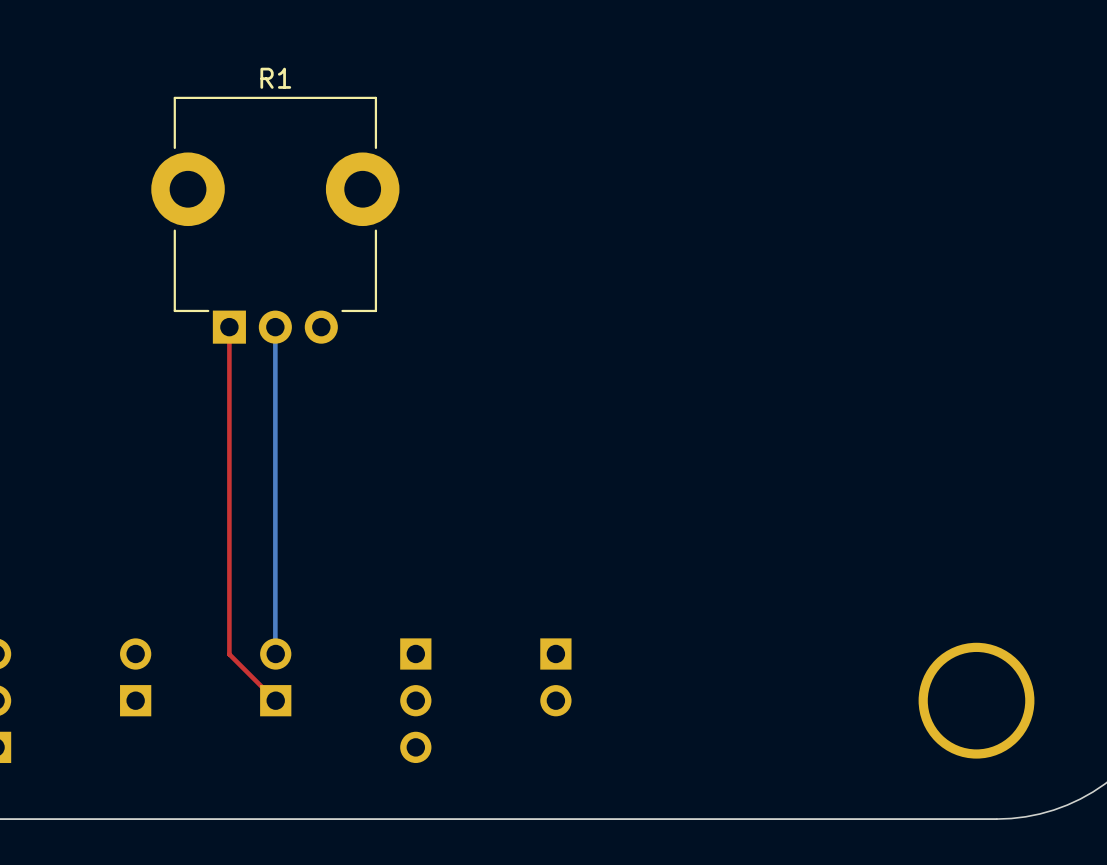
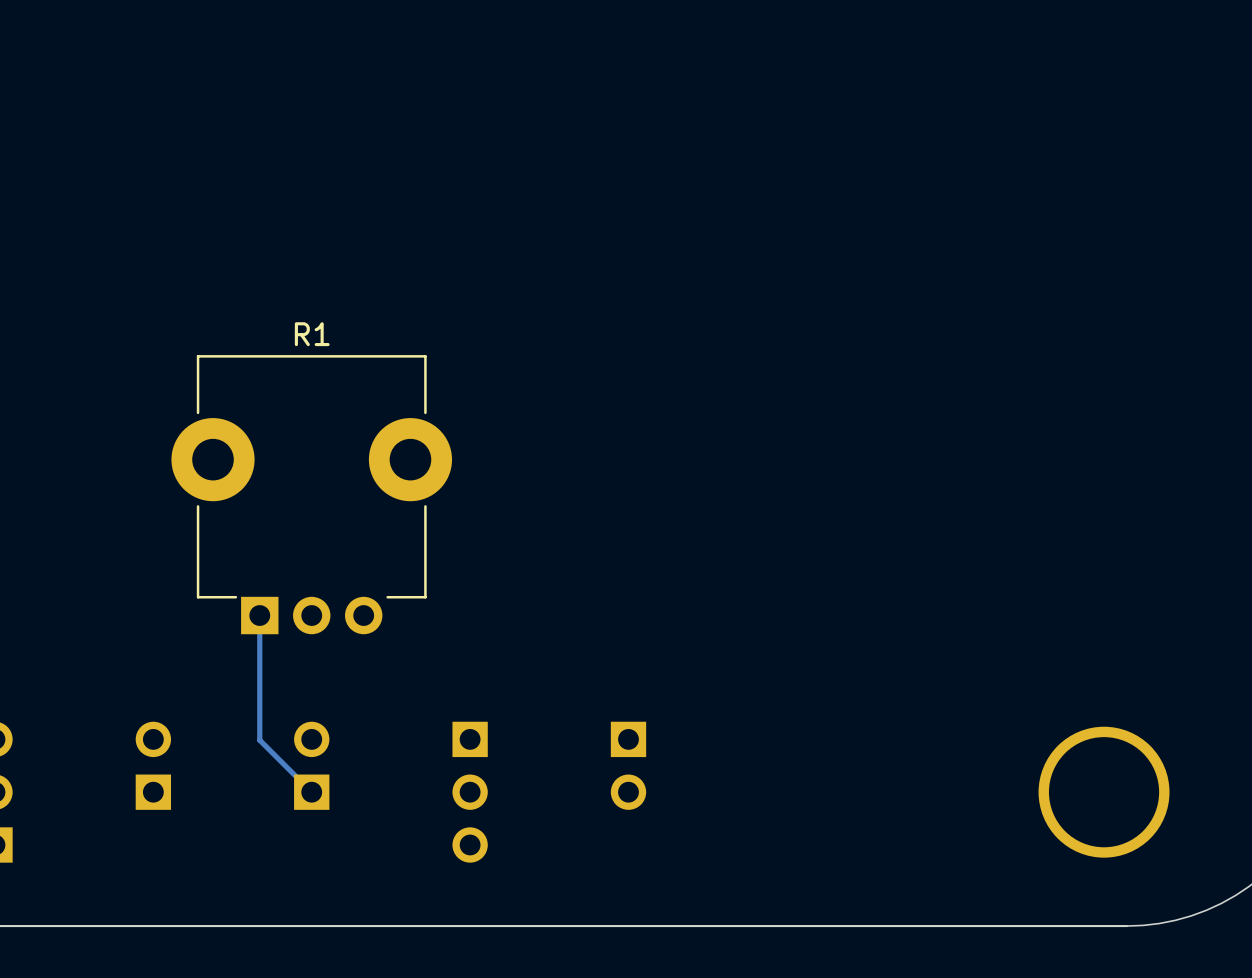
R1 position: (275, 220) -> (311, 494)
top track: (229, 327) (229, 654) (275, 700) -> none
bottom track: (275, 327) (275, 653) -> none
bottom track: none -> (259, 615) (259, 740) (311, 792)

